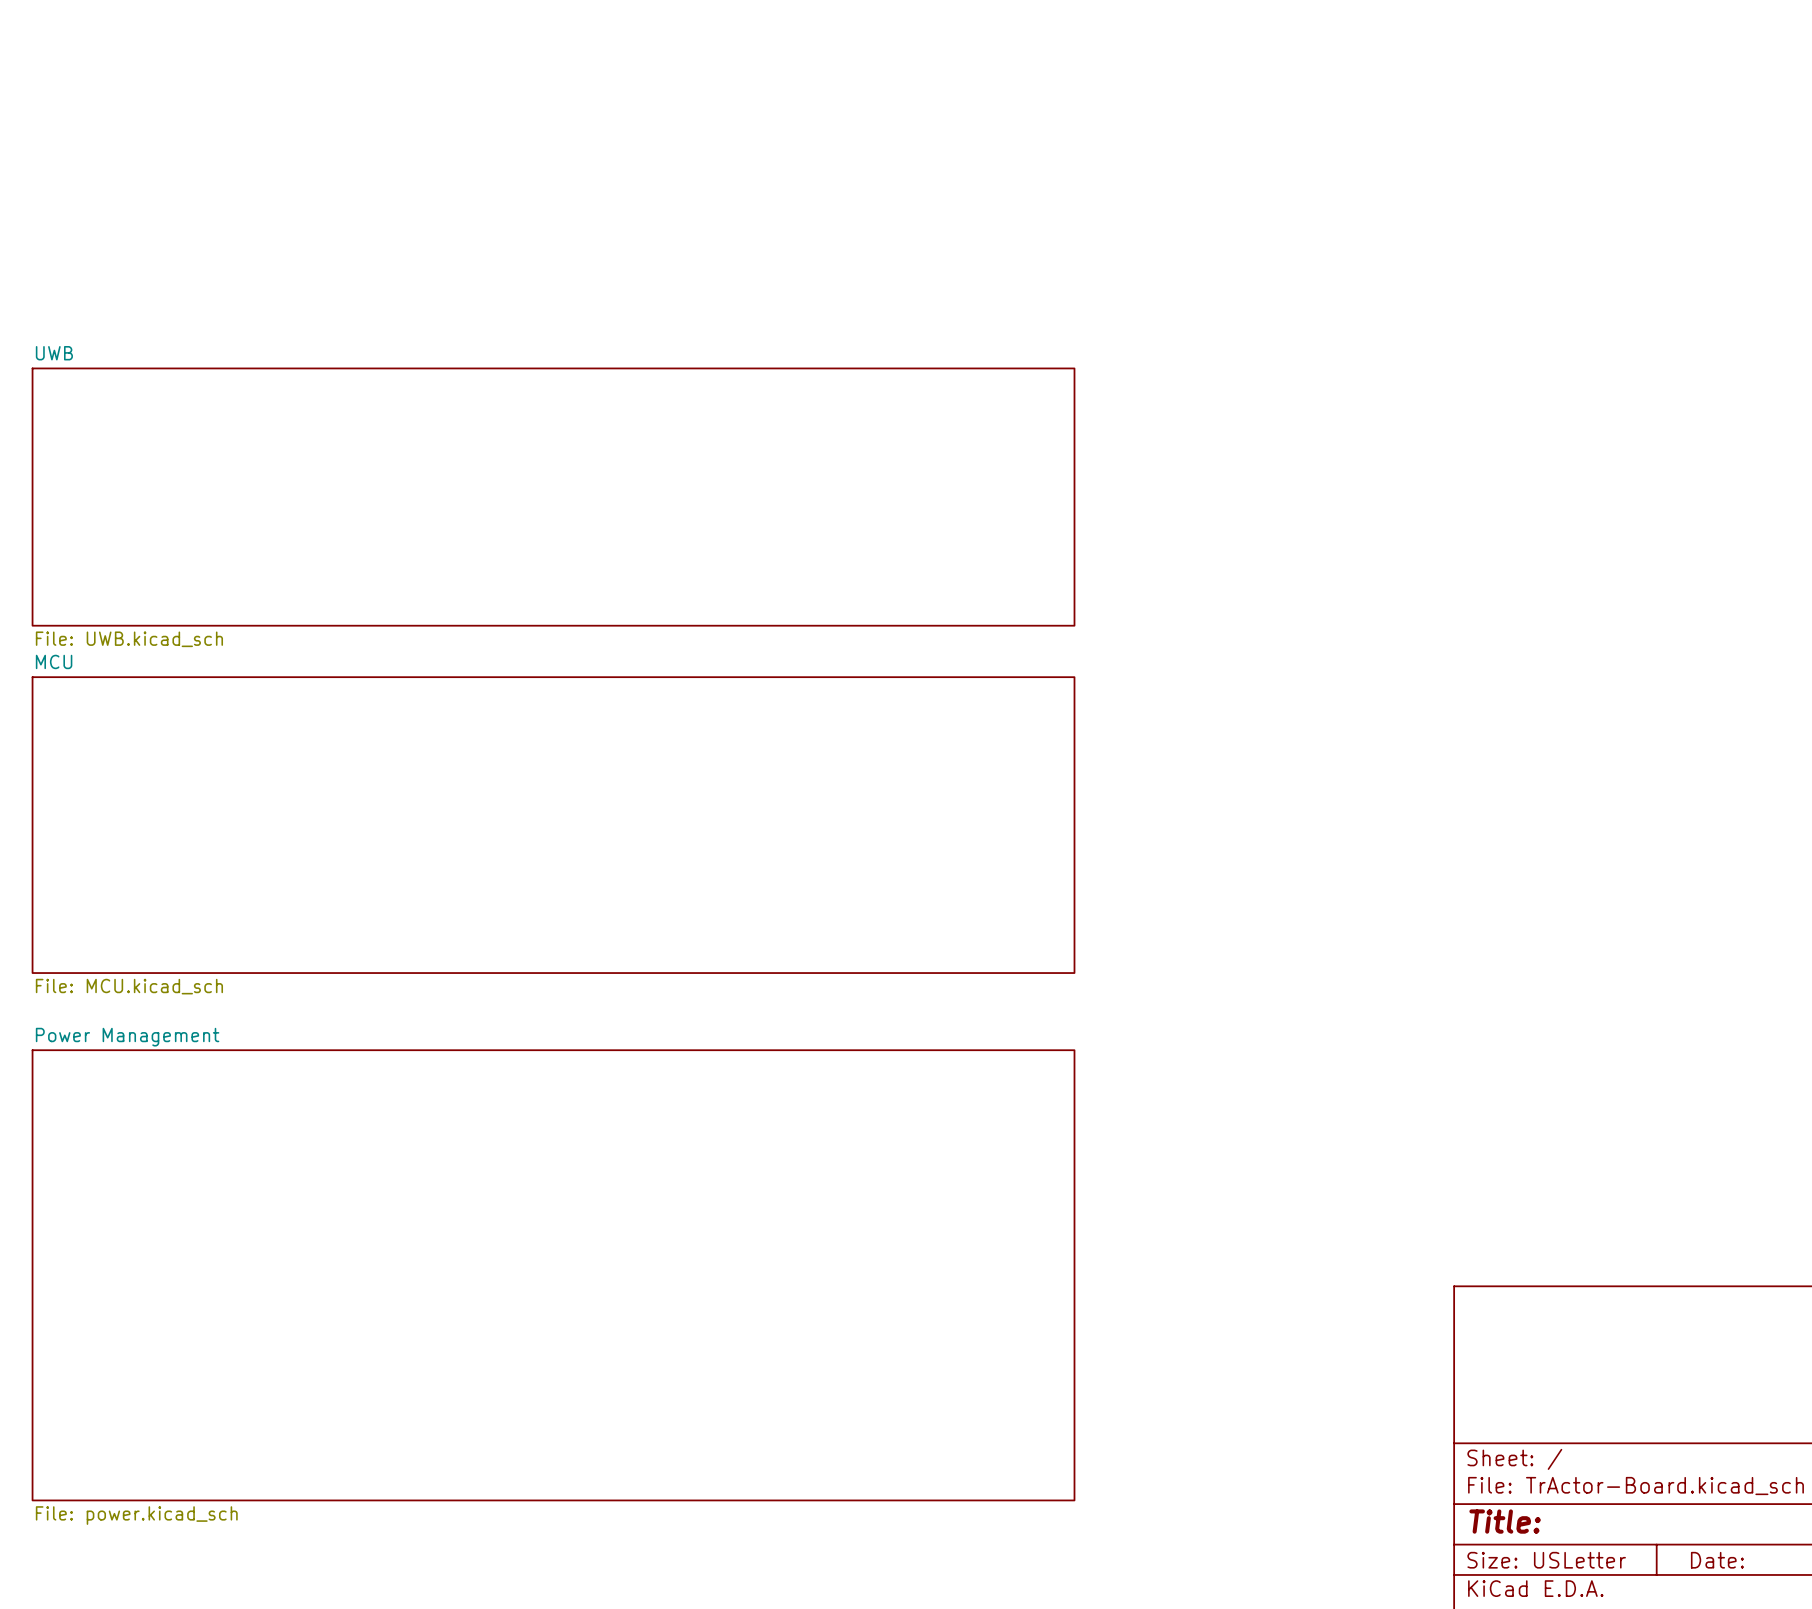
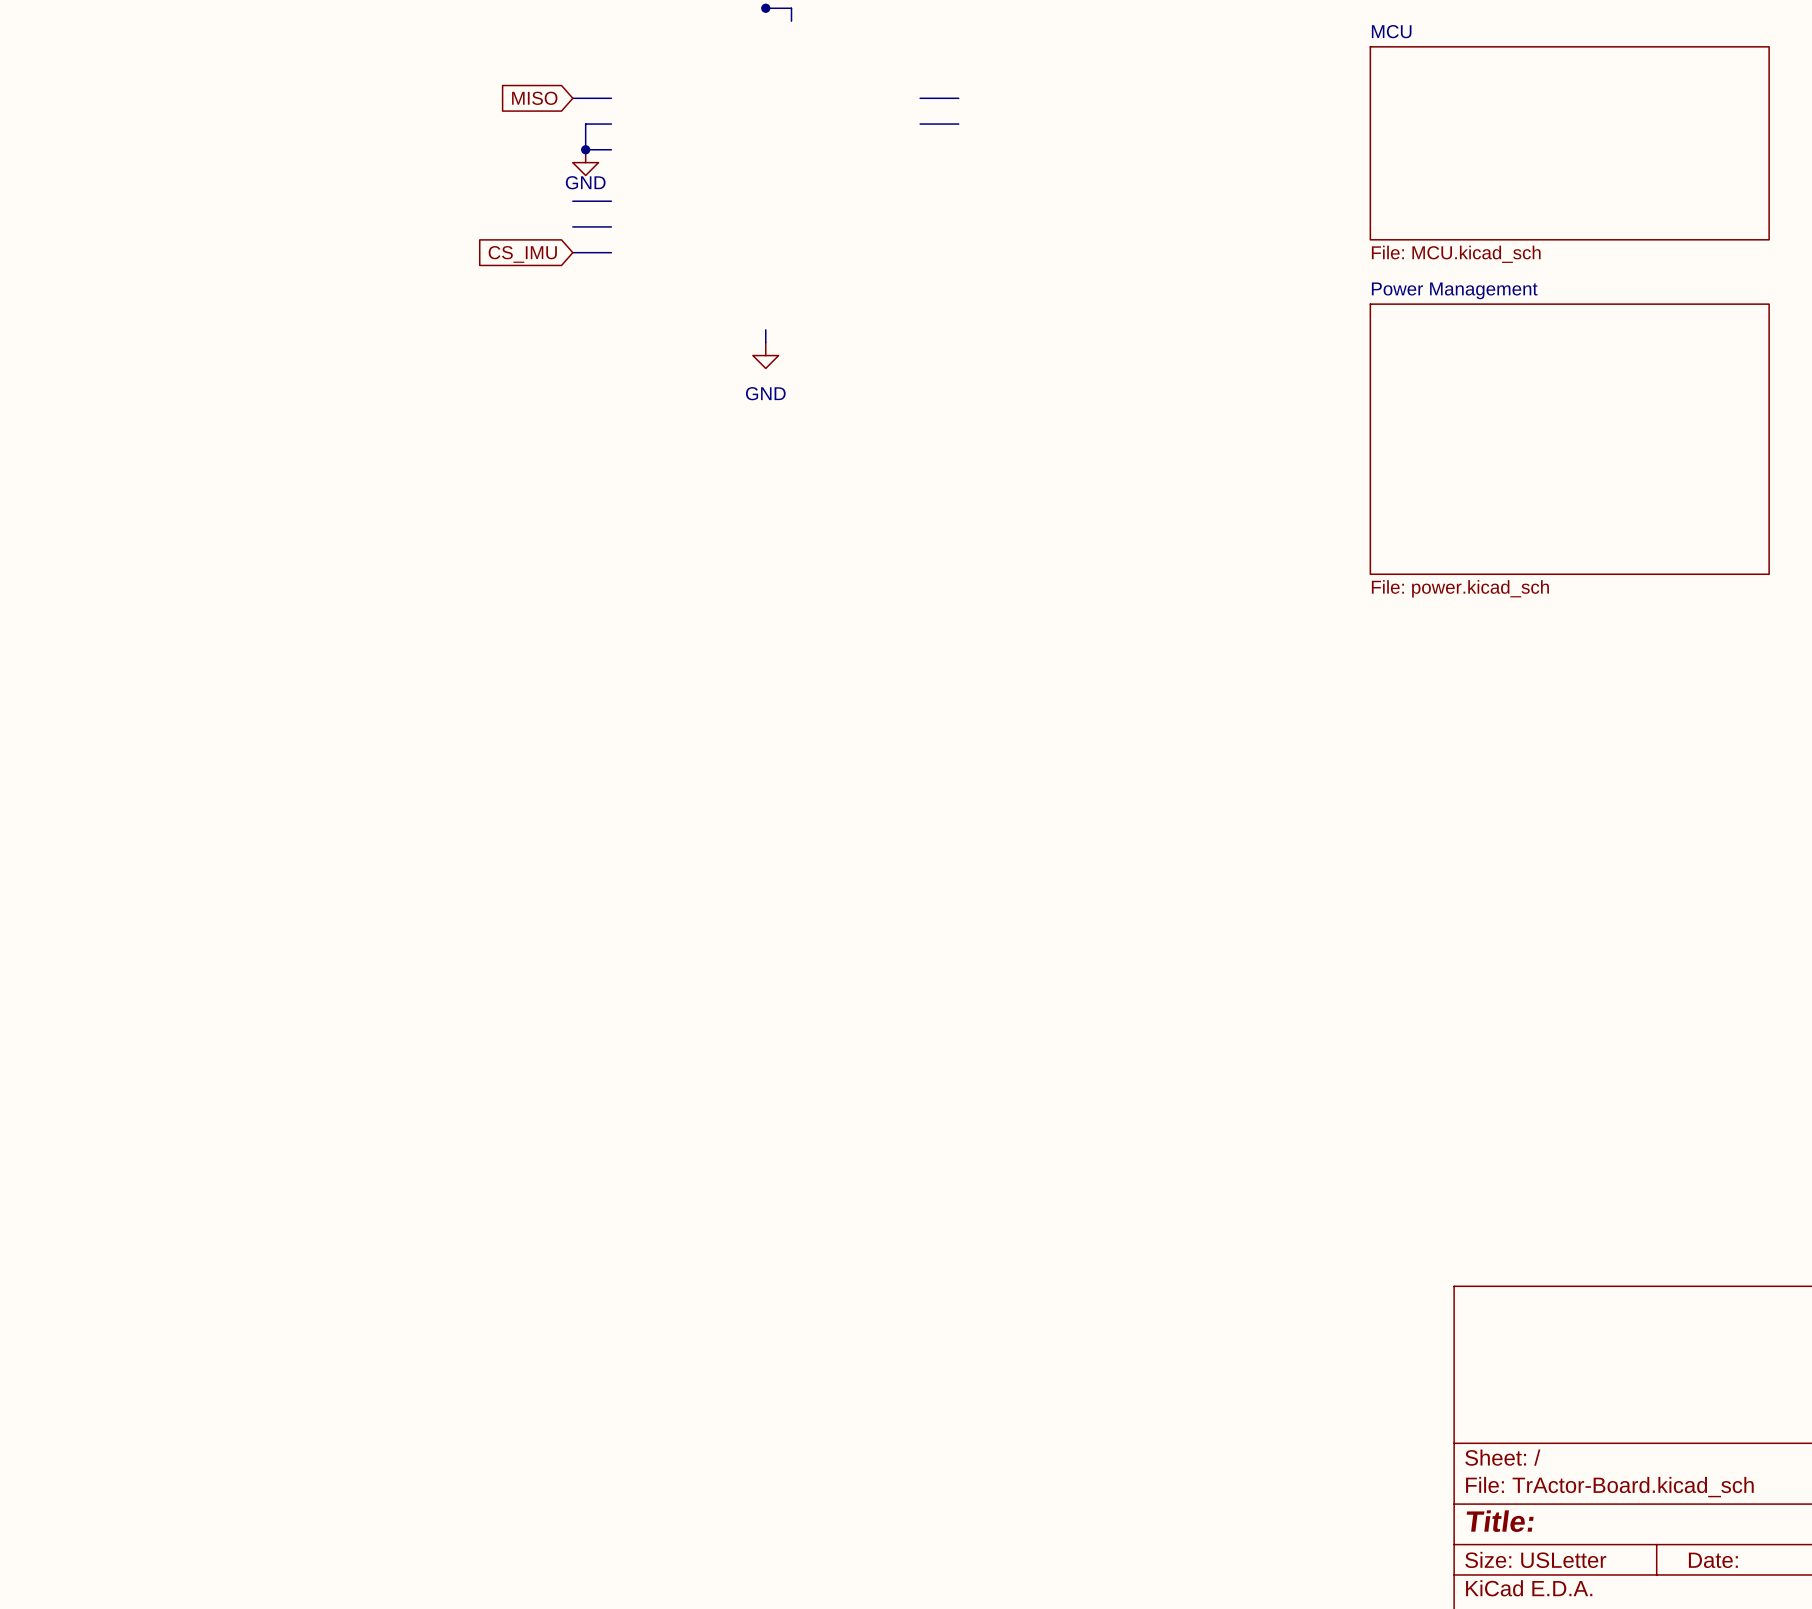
wire: none -> (765, 8) (791, 8) (791, 21)
junction: none -> (765, 8)
global label: none -> MISO (534, 98)
wire: none -> (572, 98) (611, 98)
wire: none -> (920, 98) (958, 98)
wire: none -> (611, 124) (585, 124) (585, 149) (611, 149)
wire: none -> (920, 124) (958, 124)
sheet MCU: none -> File: MCU.kicad_sch (1569, 143)
junction: none -> (585, 149)
power symbol: none -> GND (585, 162)
wire: none -> (572, 201) (611, 201)
wire: none -> (572, 226) (611, 226)
wire: none -> (572, 252) (611, 252)
global label: none -> CS_IMU (522, 254)
wire: none -> (765, 329) (765, 342)
power symbol: none -> GND (765, 355)
sheet Power Management: none -> File: power.kicad_sch (1569, 439)
sheet UWB: File: UWB.kicad_sch (553, 497) -> none
sheet MCU: File: MCU.kicad_sch (553, 825) -> none
sheet Power Management: File: power.kicad_sch (553, 1275) -> none

